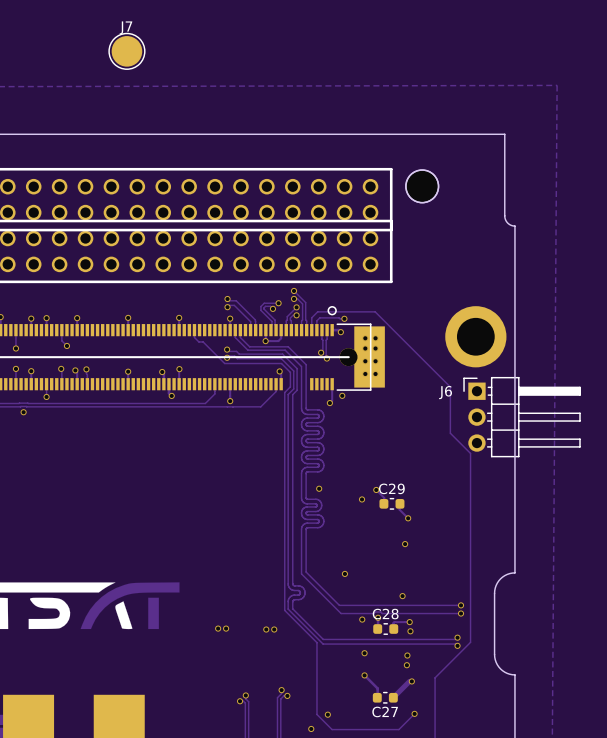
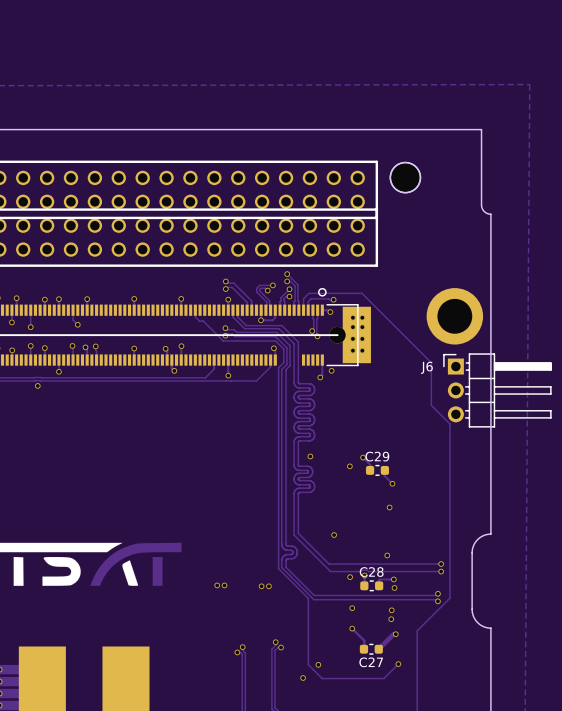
J7: (126, 51) -> none

